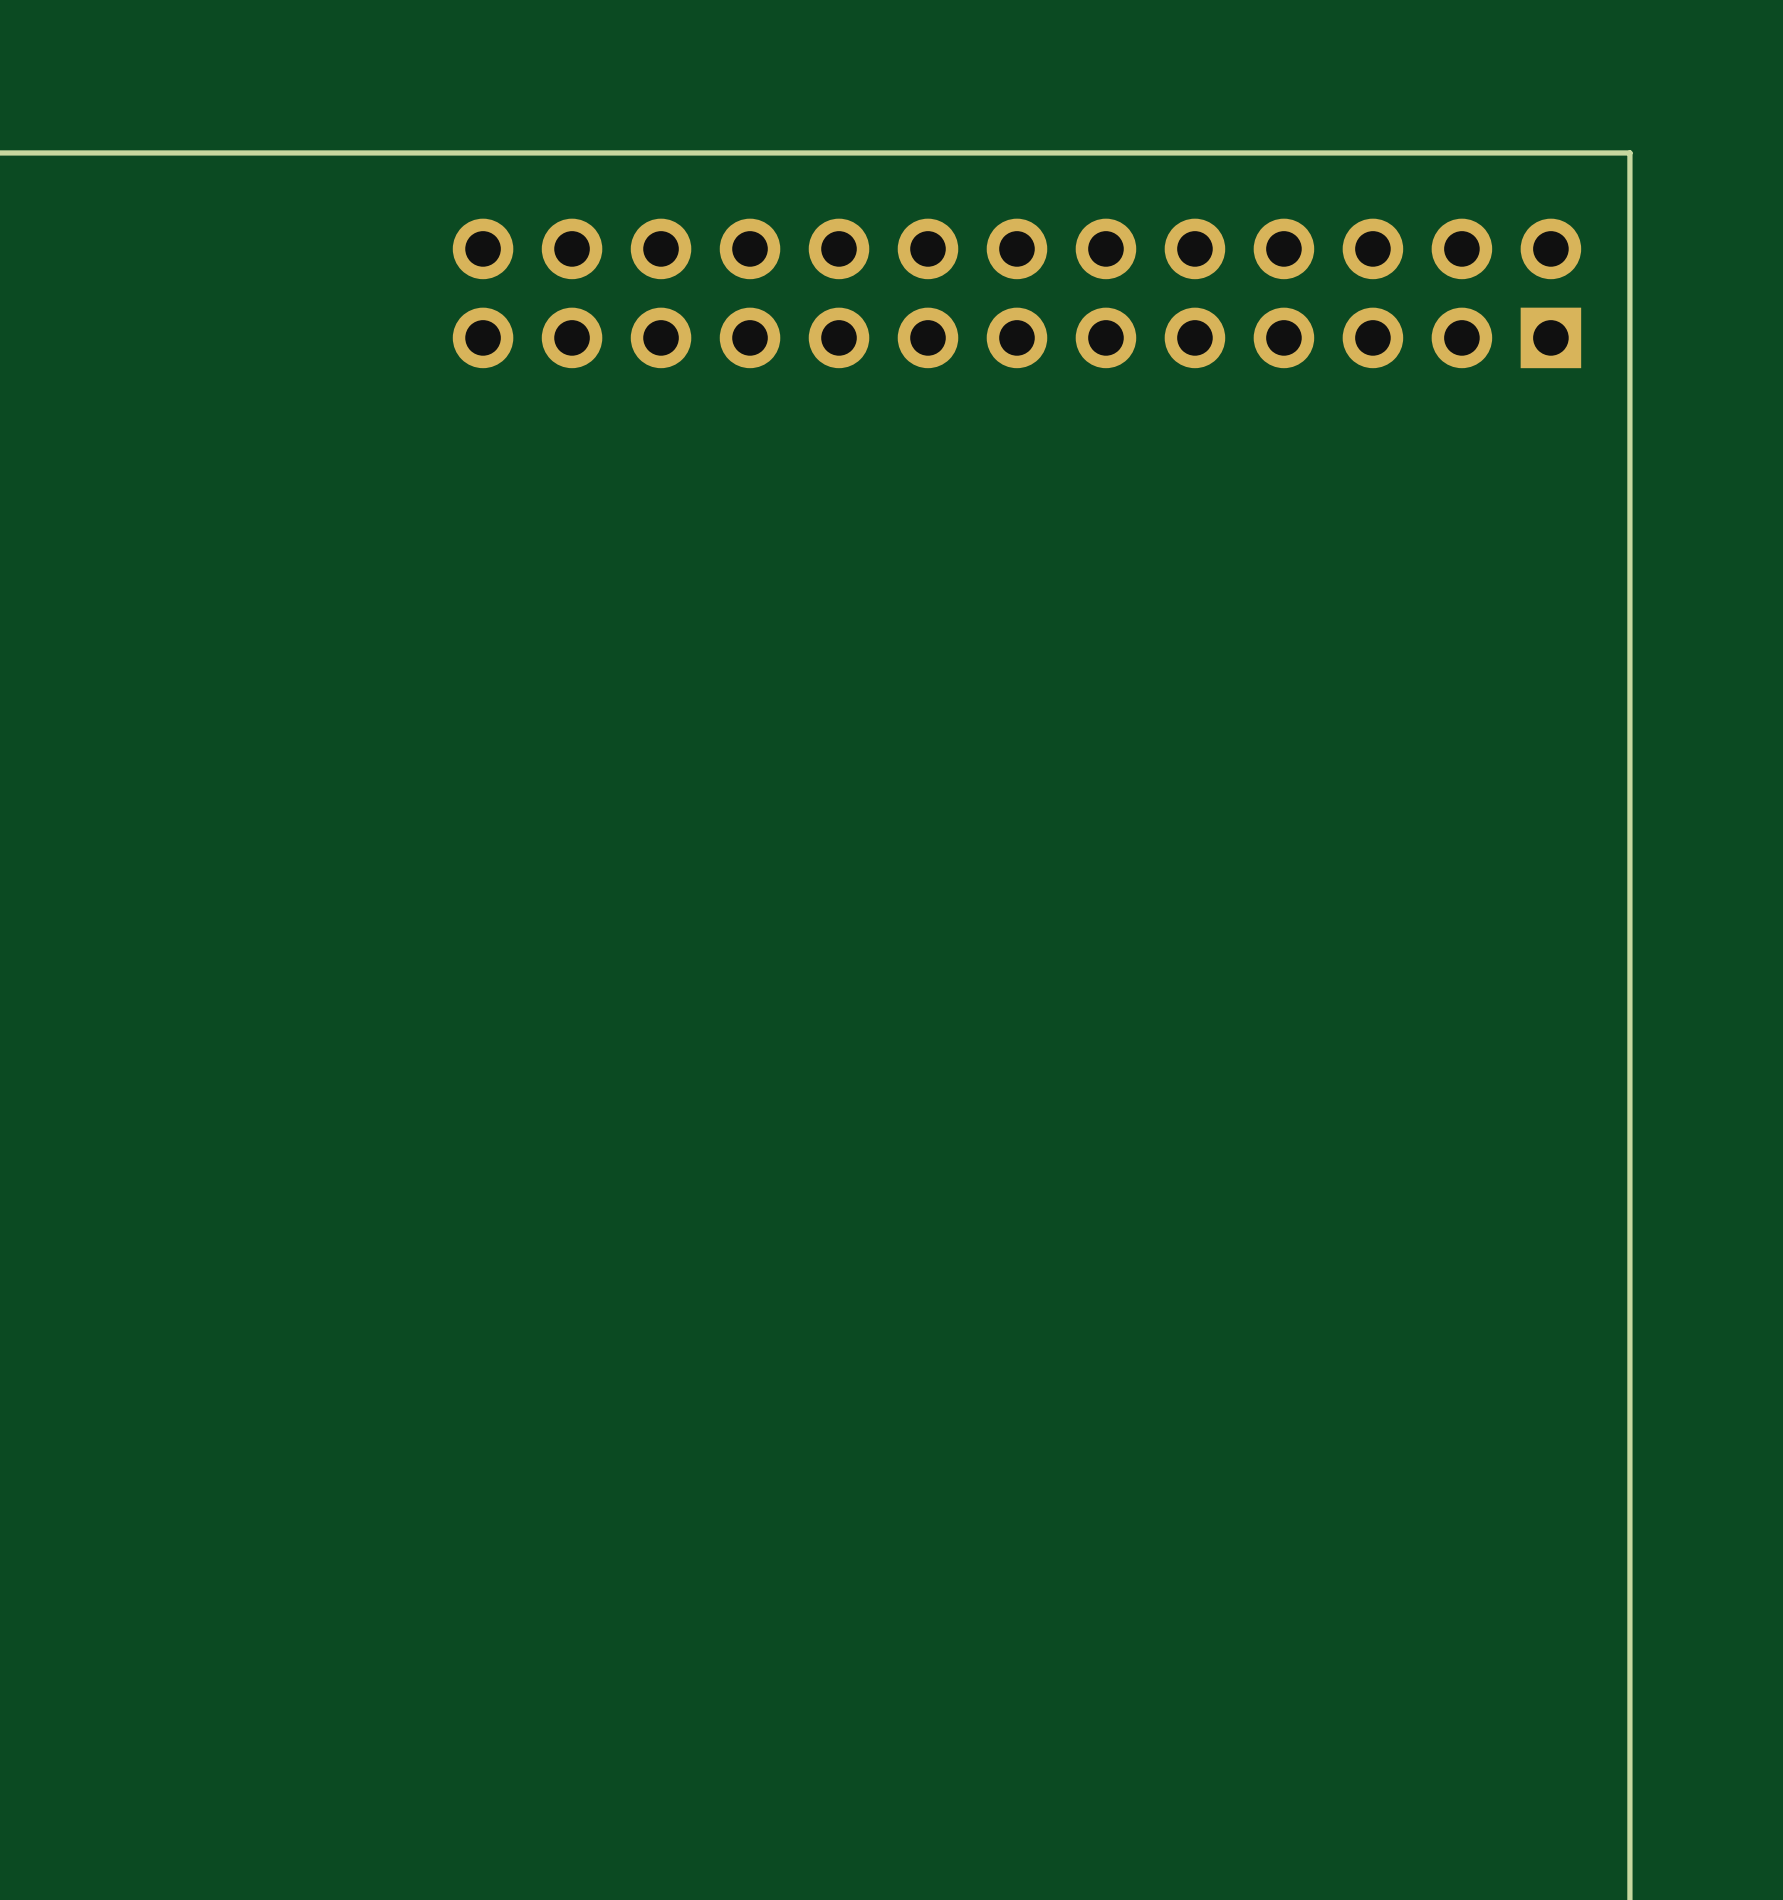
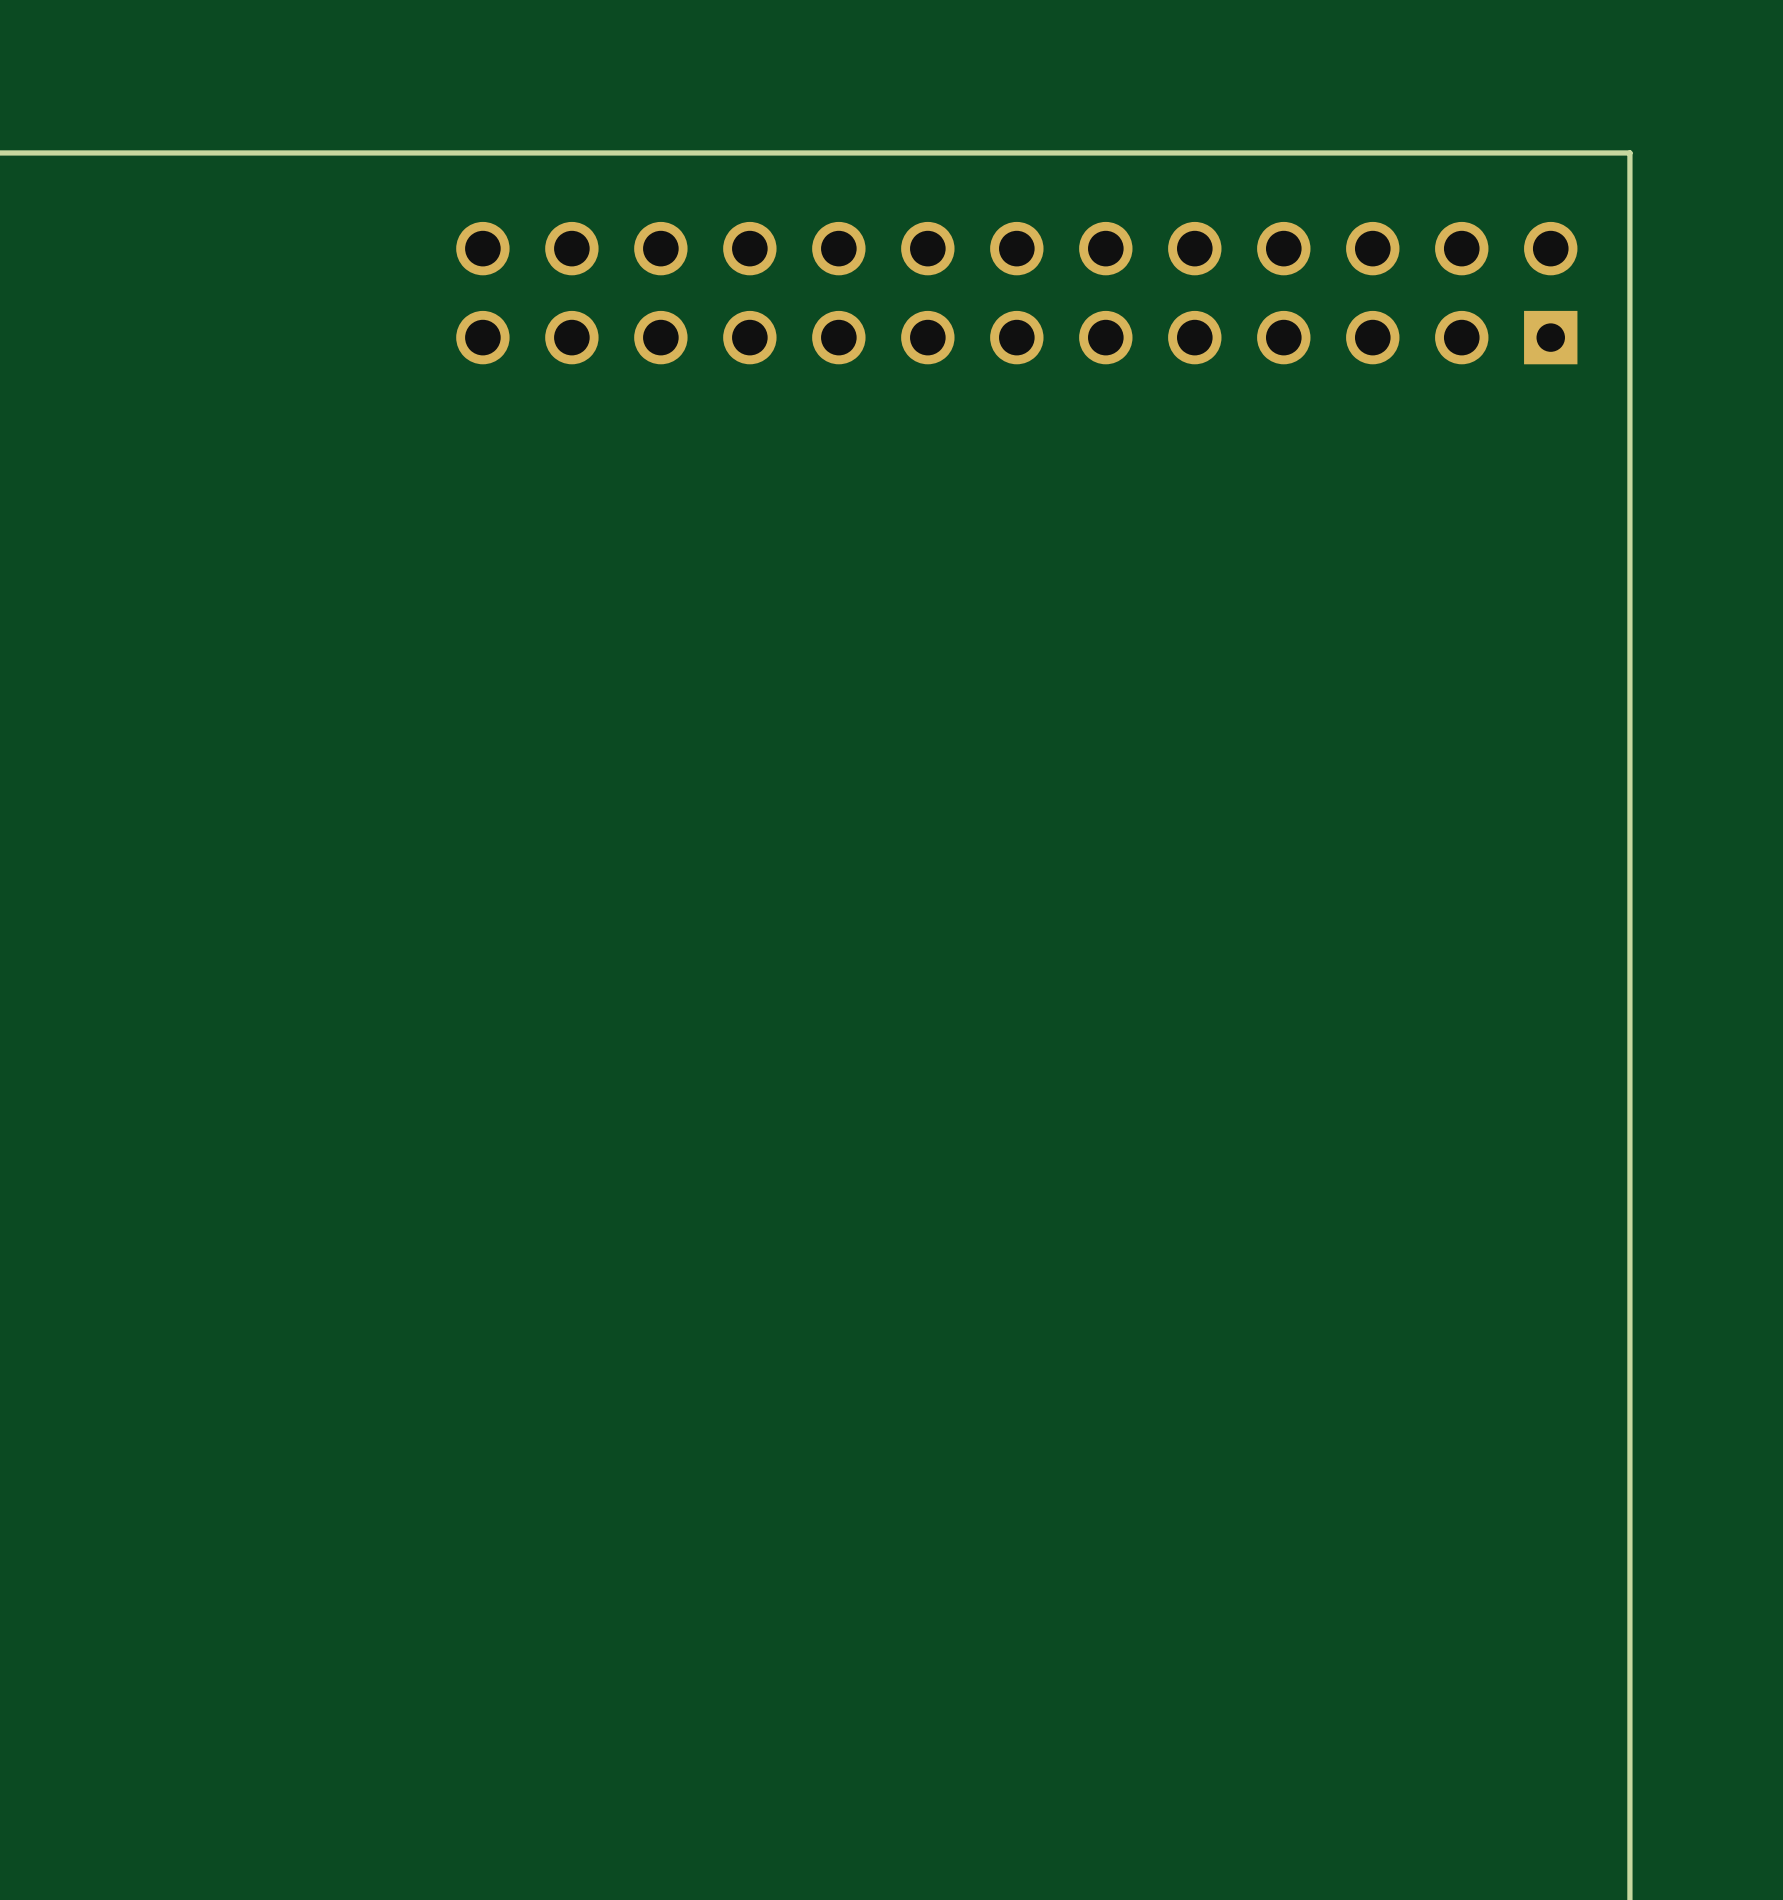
part footprint: [452, 218, 1582, 369] -> [456, 221, 1578, 365]

